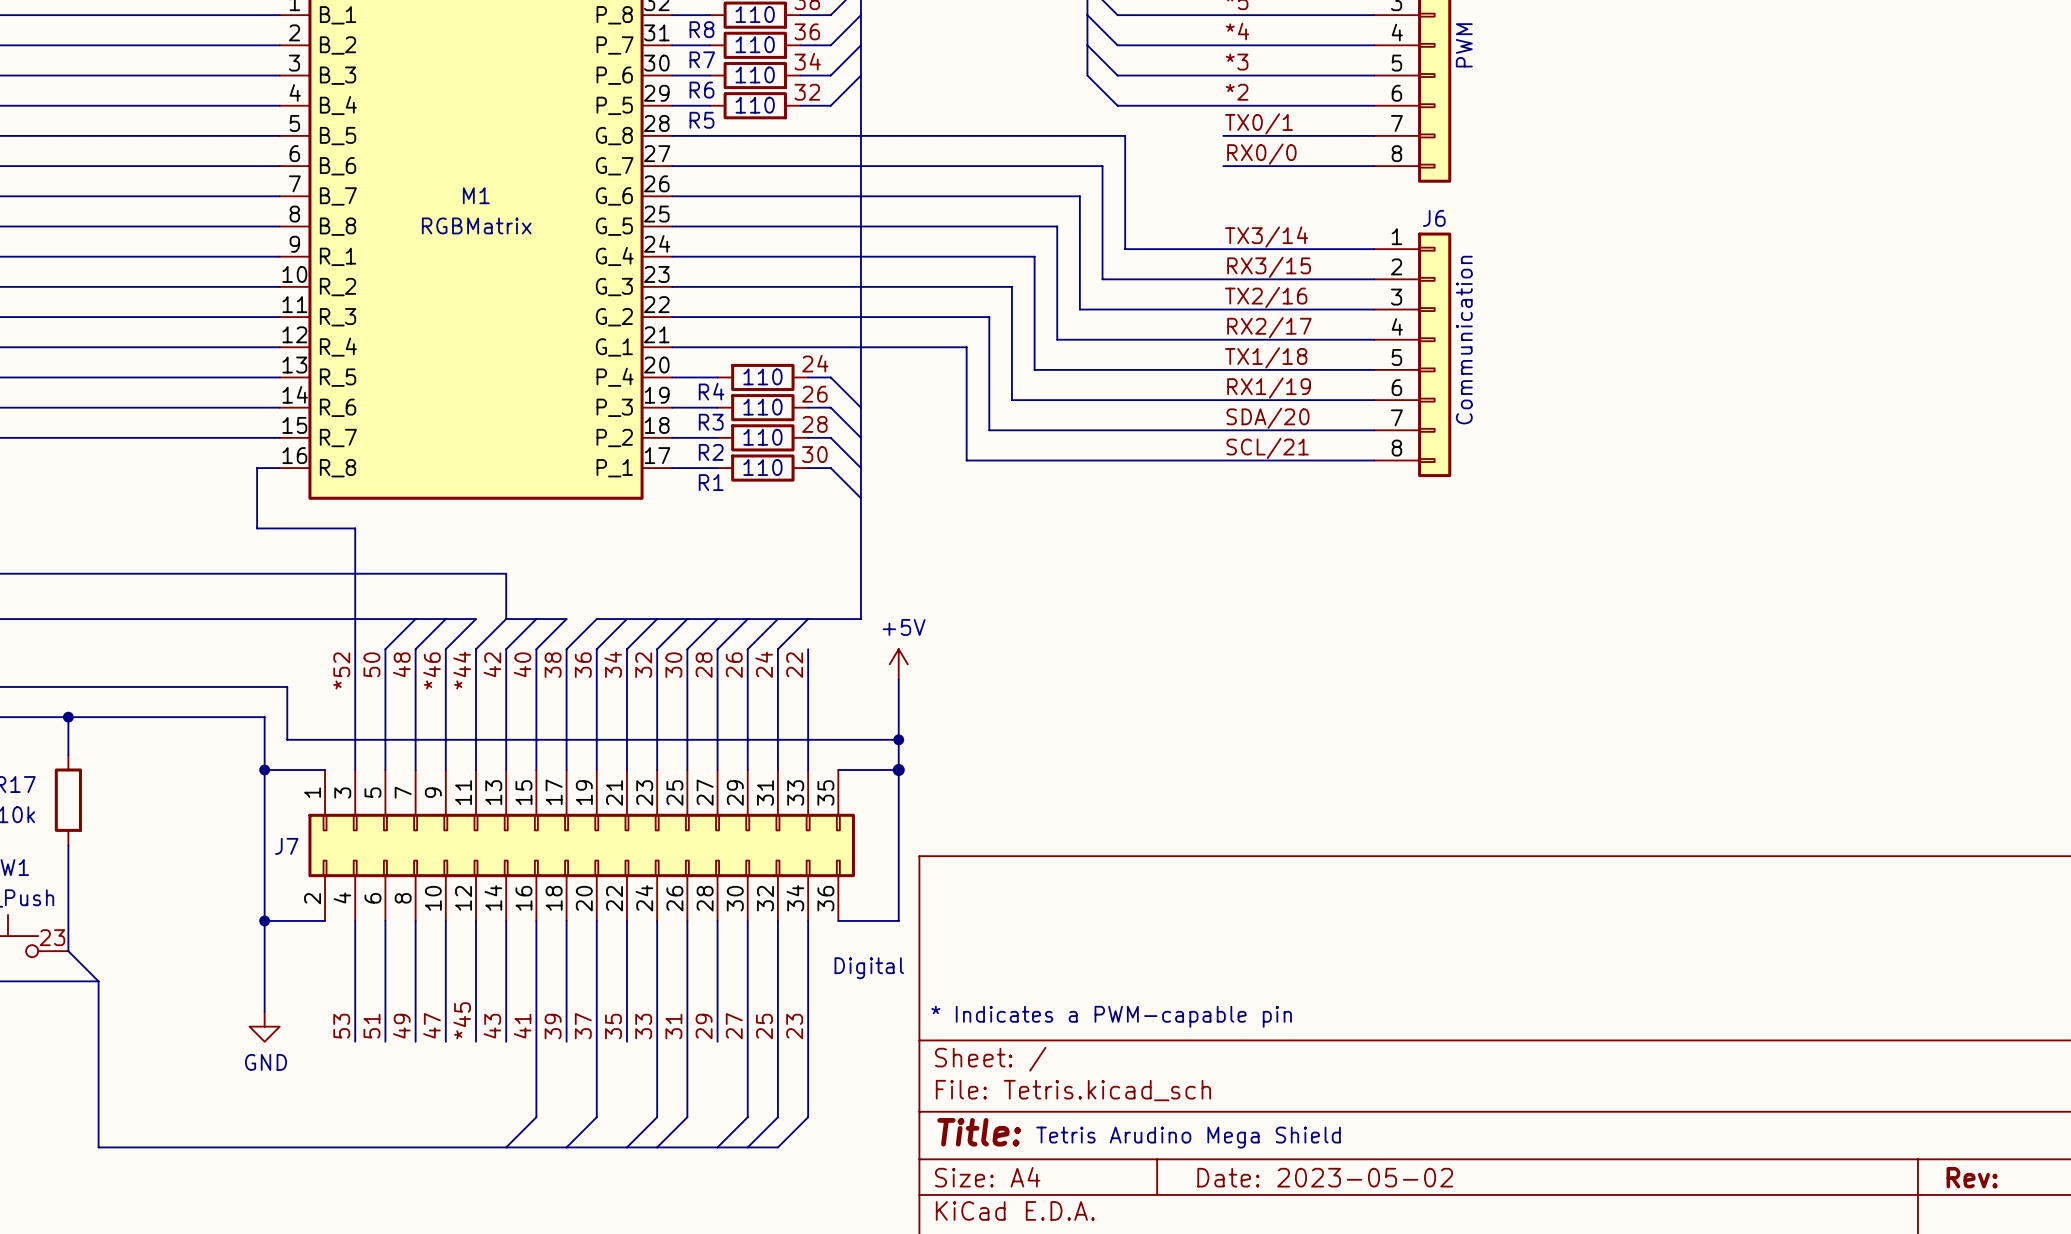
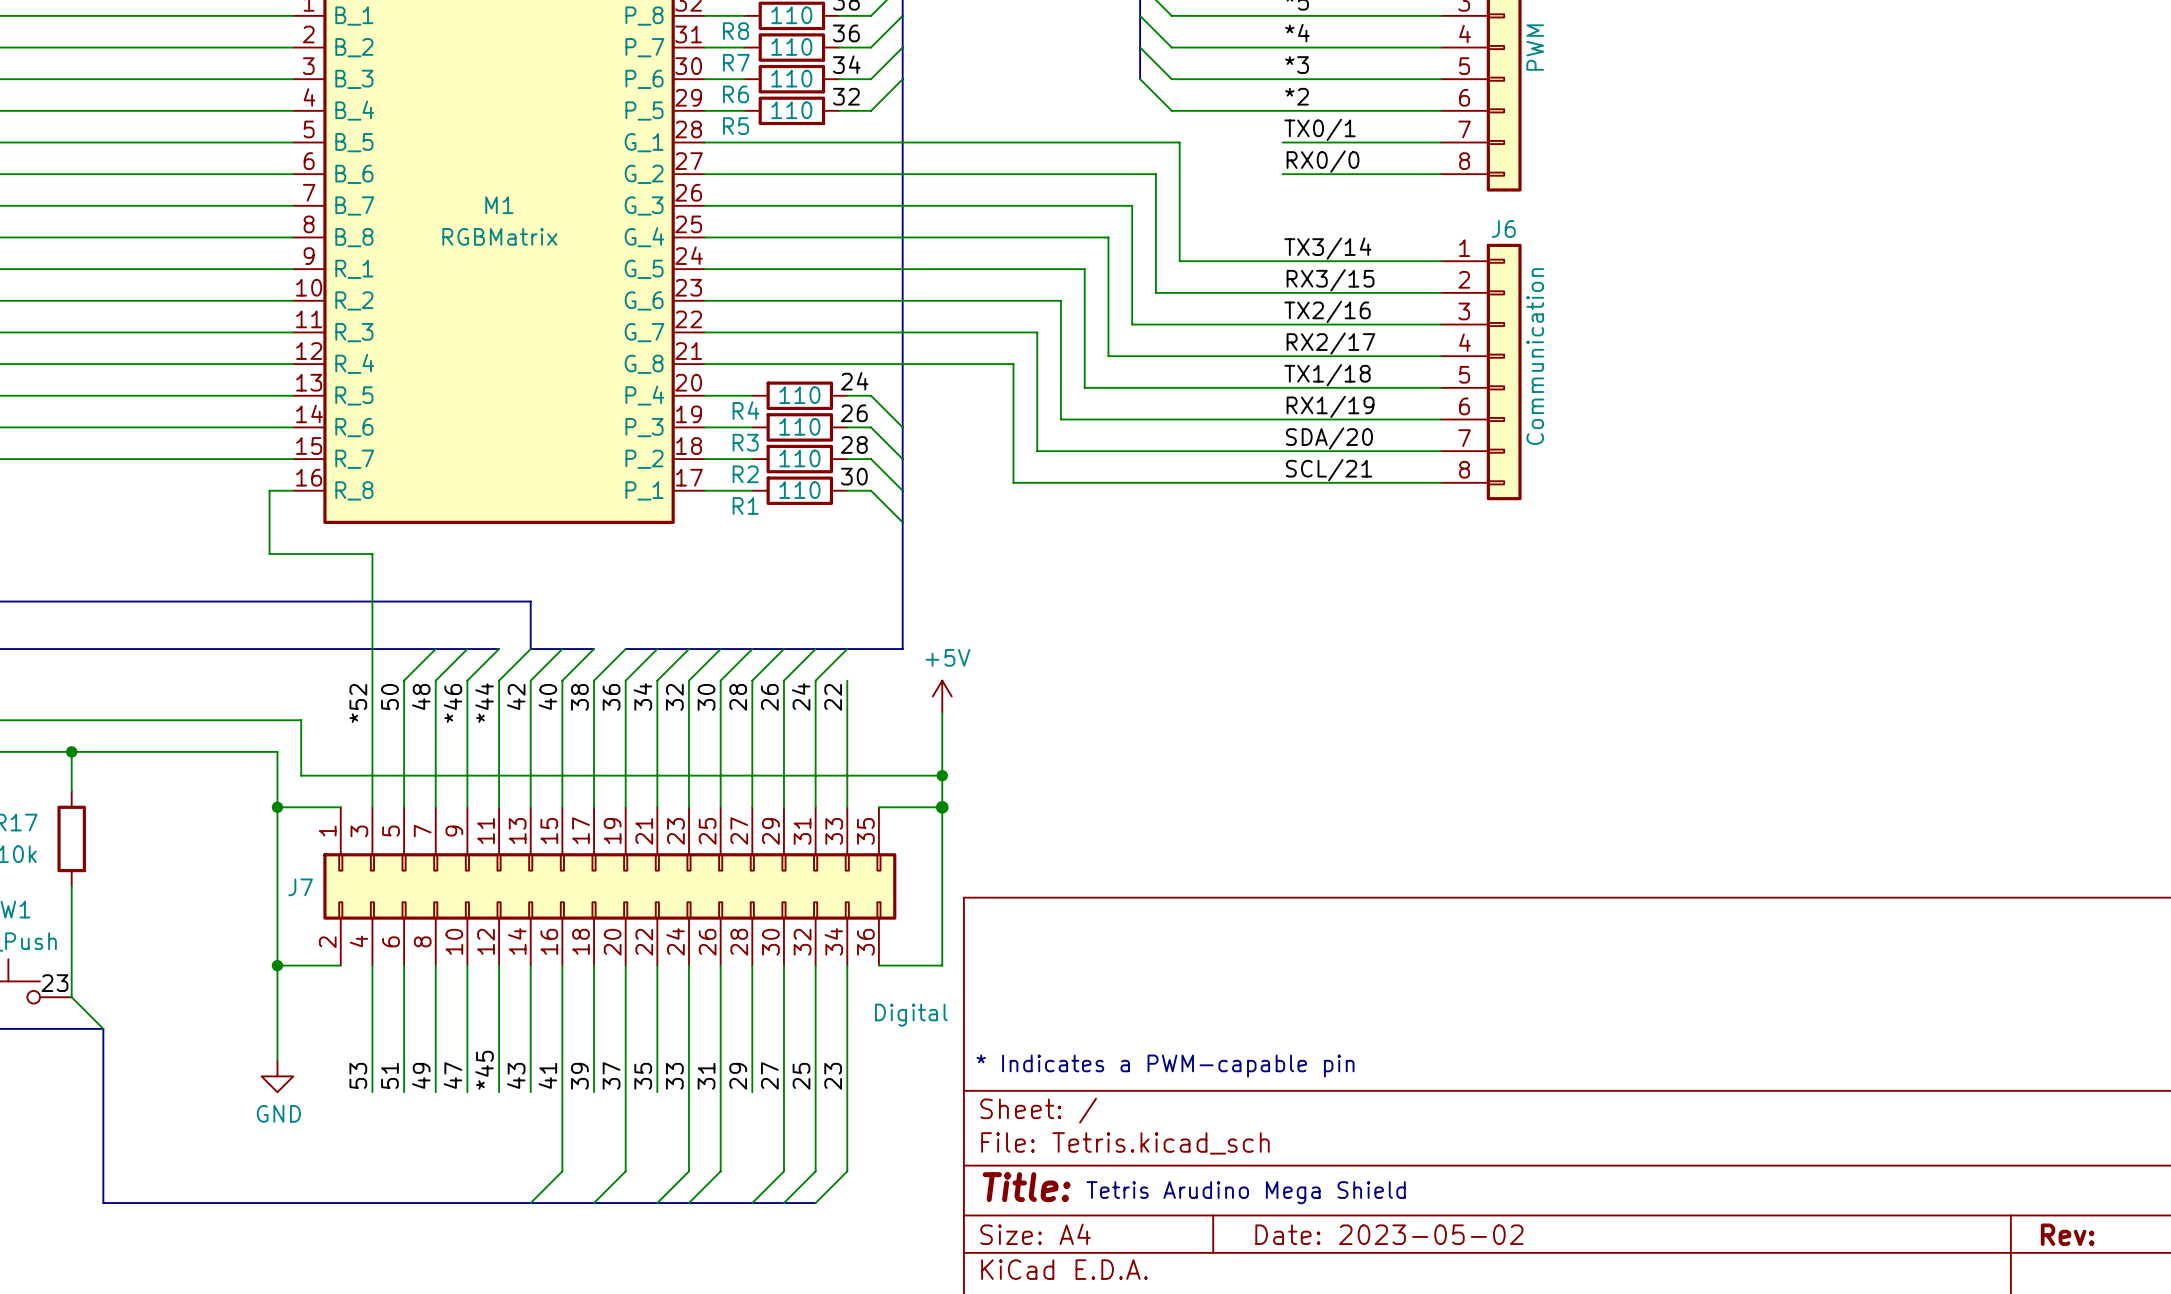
M1 pin name: G_8 (614, 136) -> G_1 (644, 142)
M1 pin name: G_7 (614, 166) -> G_2 (644, 174)
M1 pin name: G_6 (614, 196) -> G_3 (644, 205)
M1 pin name: G_5 (614, 226) -> G_4 (644, 237)
M1 pin name: G_4 (614, 256) -> G_5 (644, 269)
M1 pin name: G_3 (614, 287) -> G_6 (644, 300)
M1 pin name: G_2 (614, 317) -> G_7 (644, 332)
M1 pin name: G_1 (614, 347) -> G_8 (644, 364)

